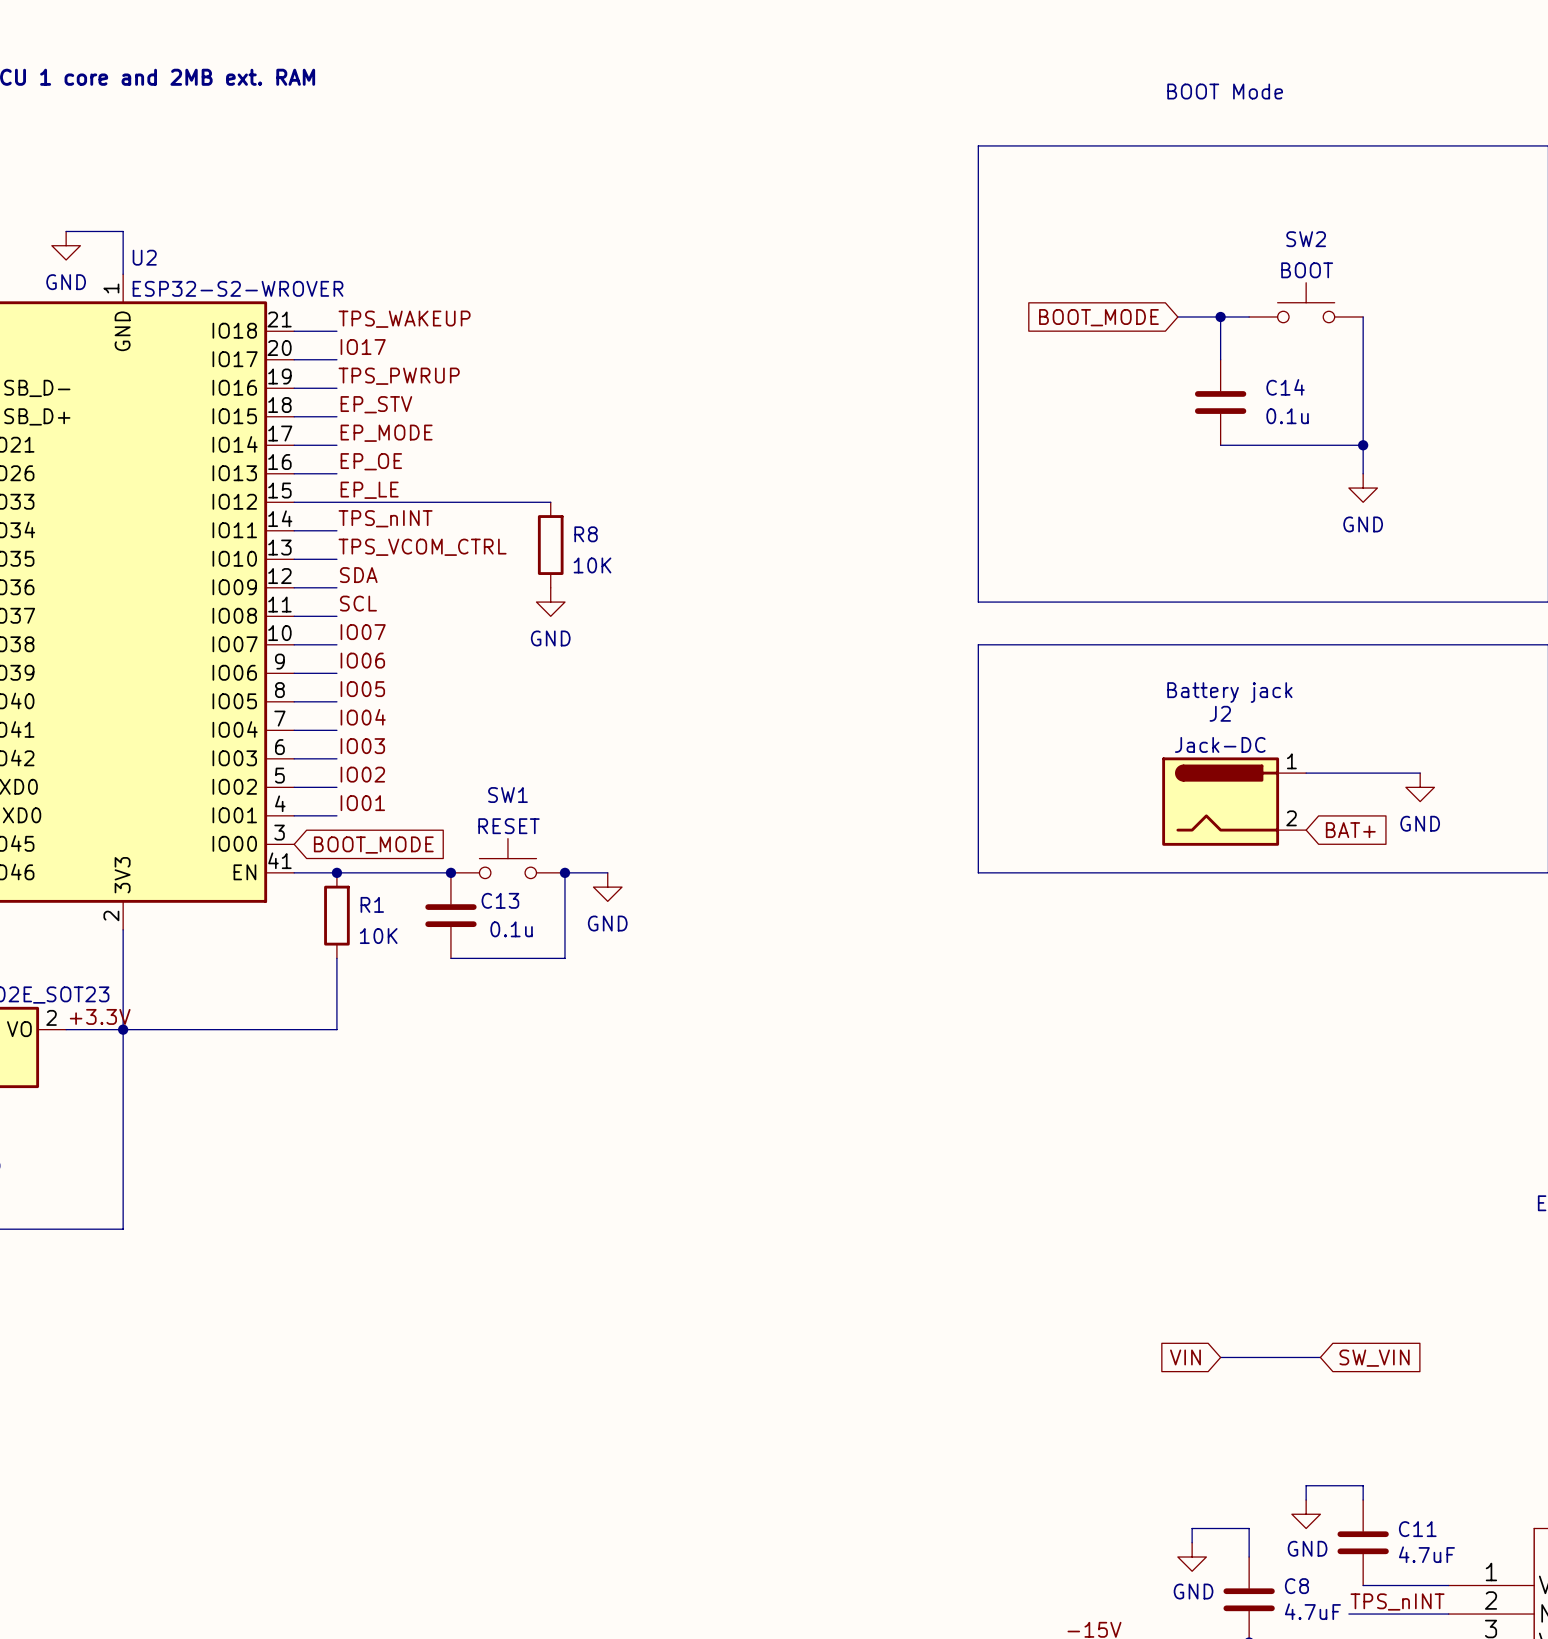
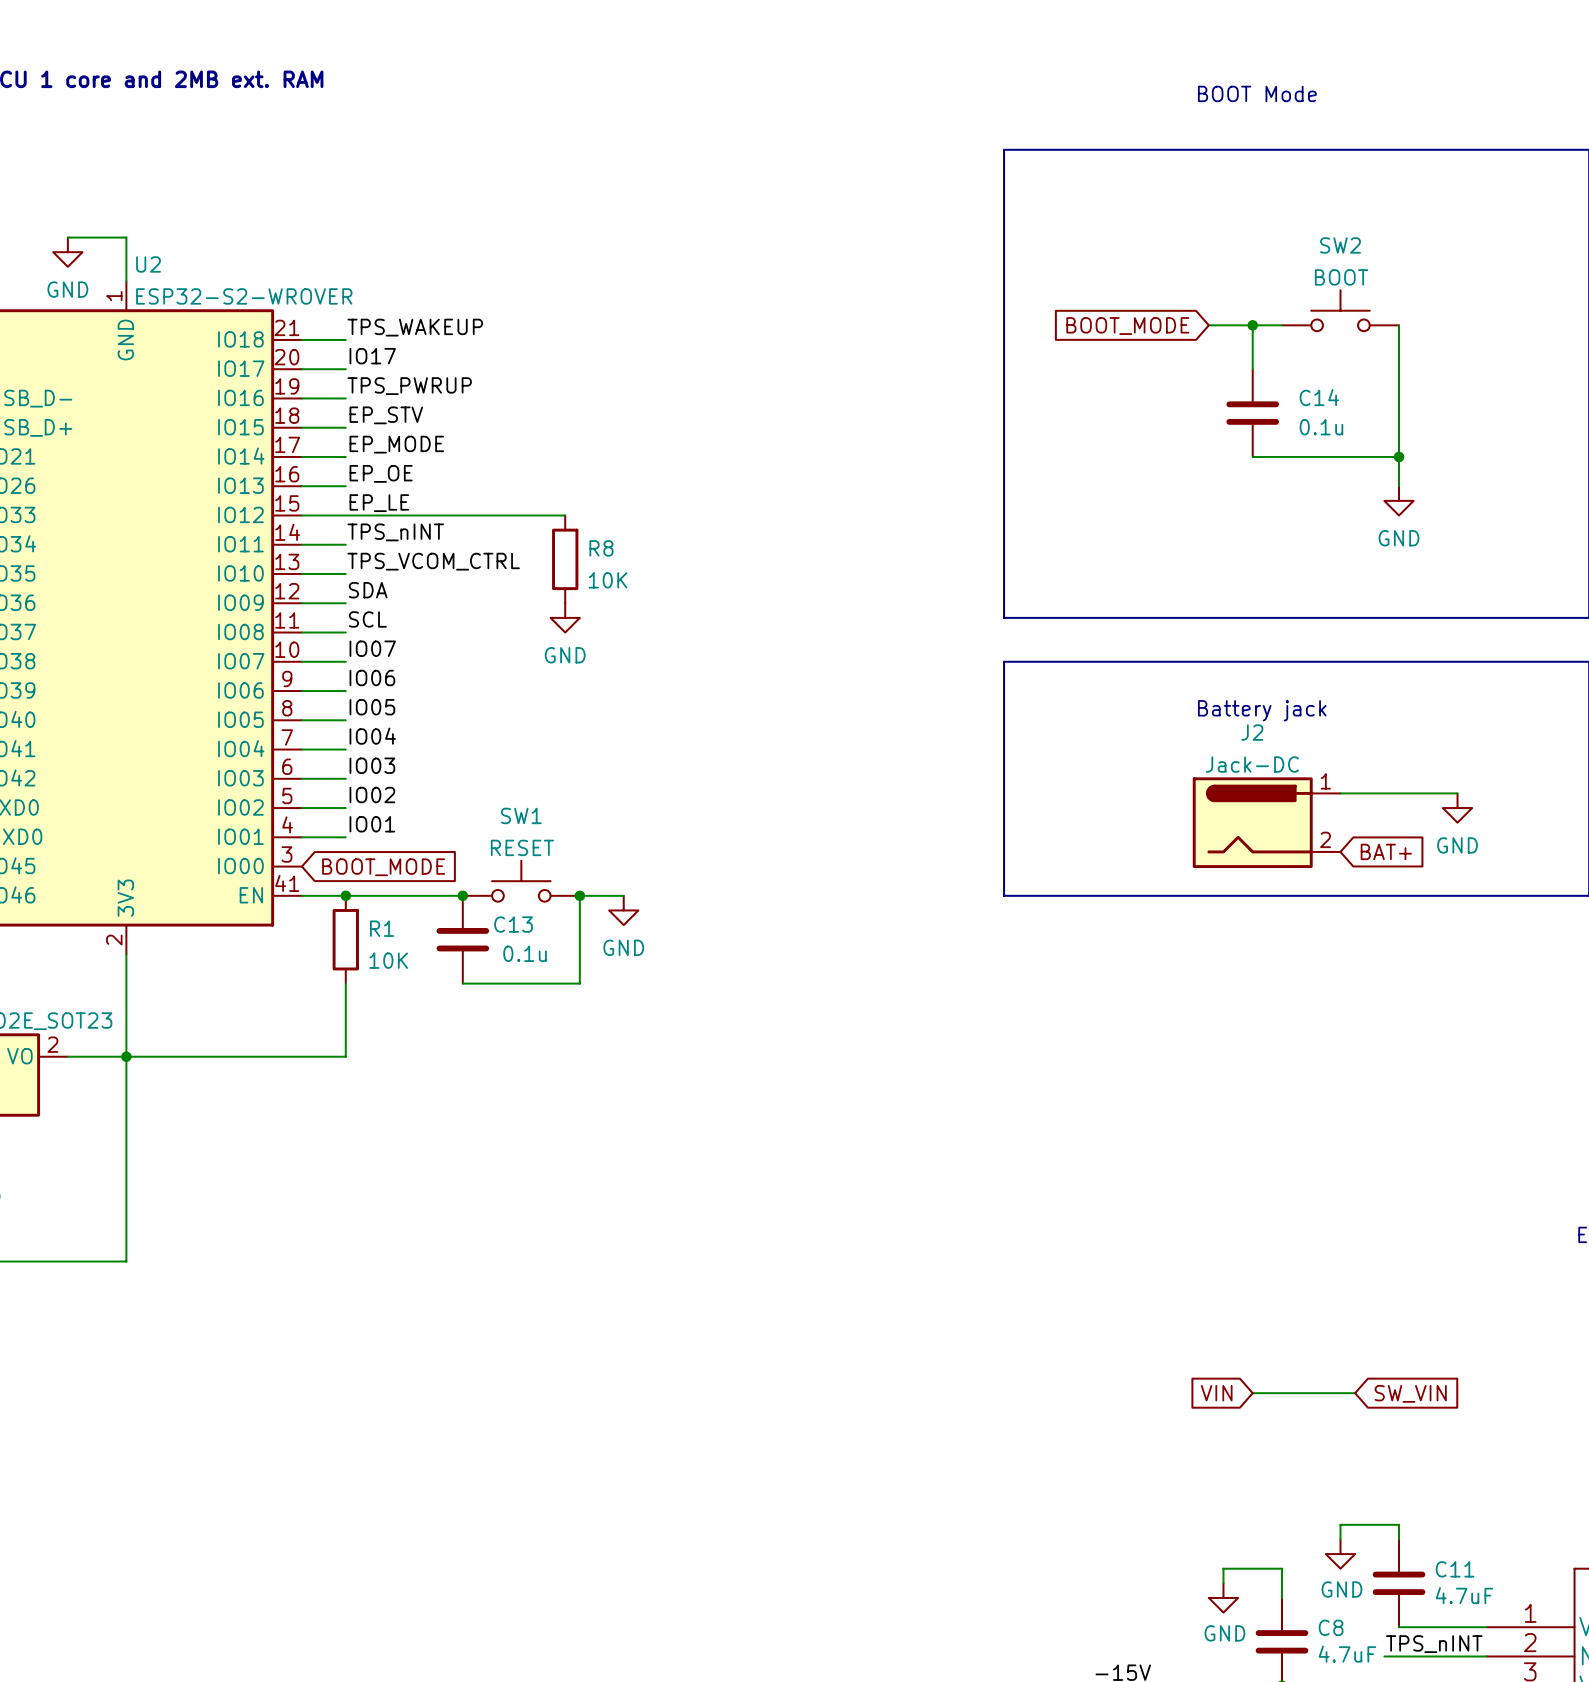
label: +3.3V (100, 1016) -> none

